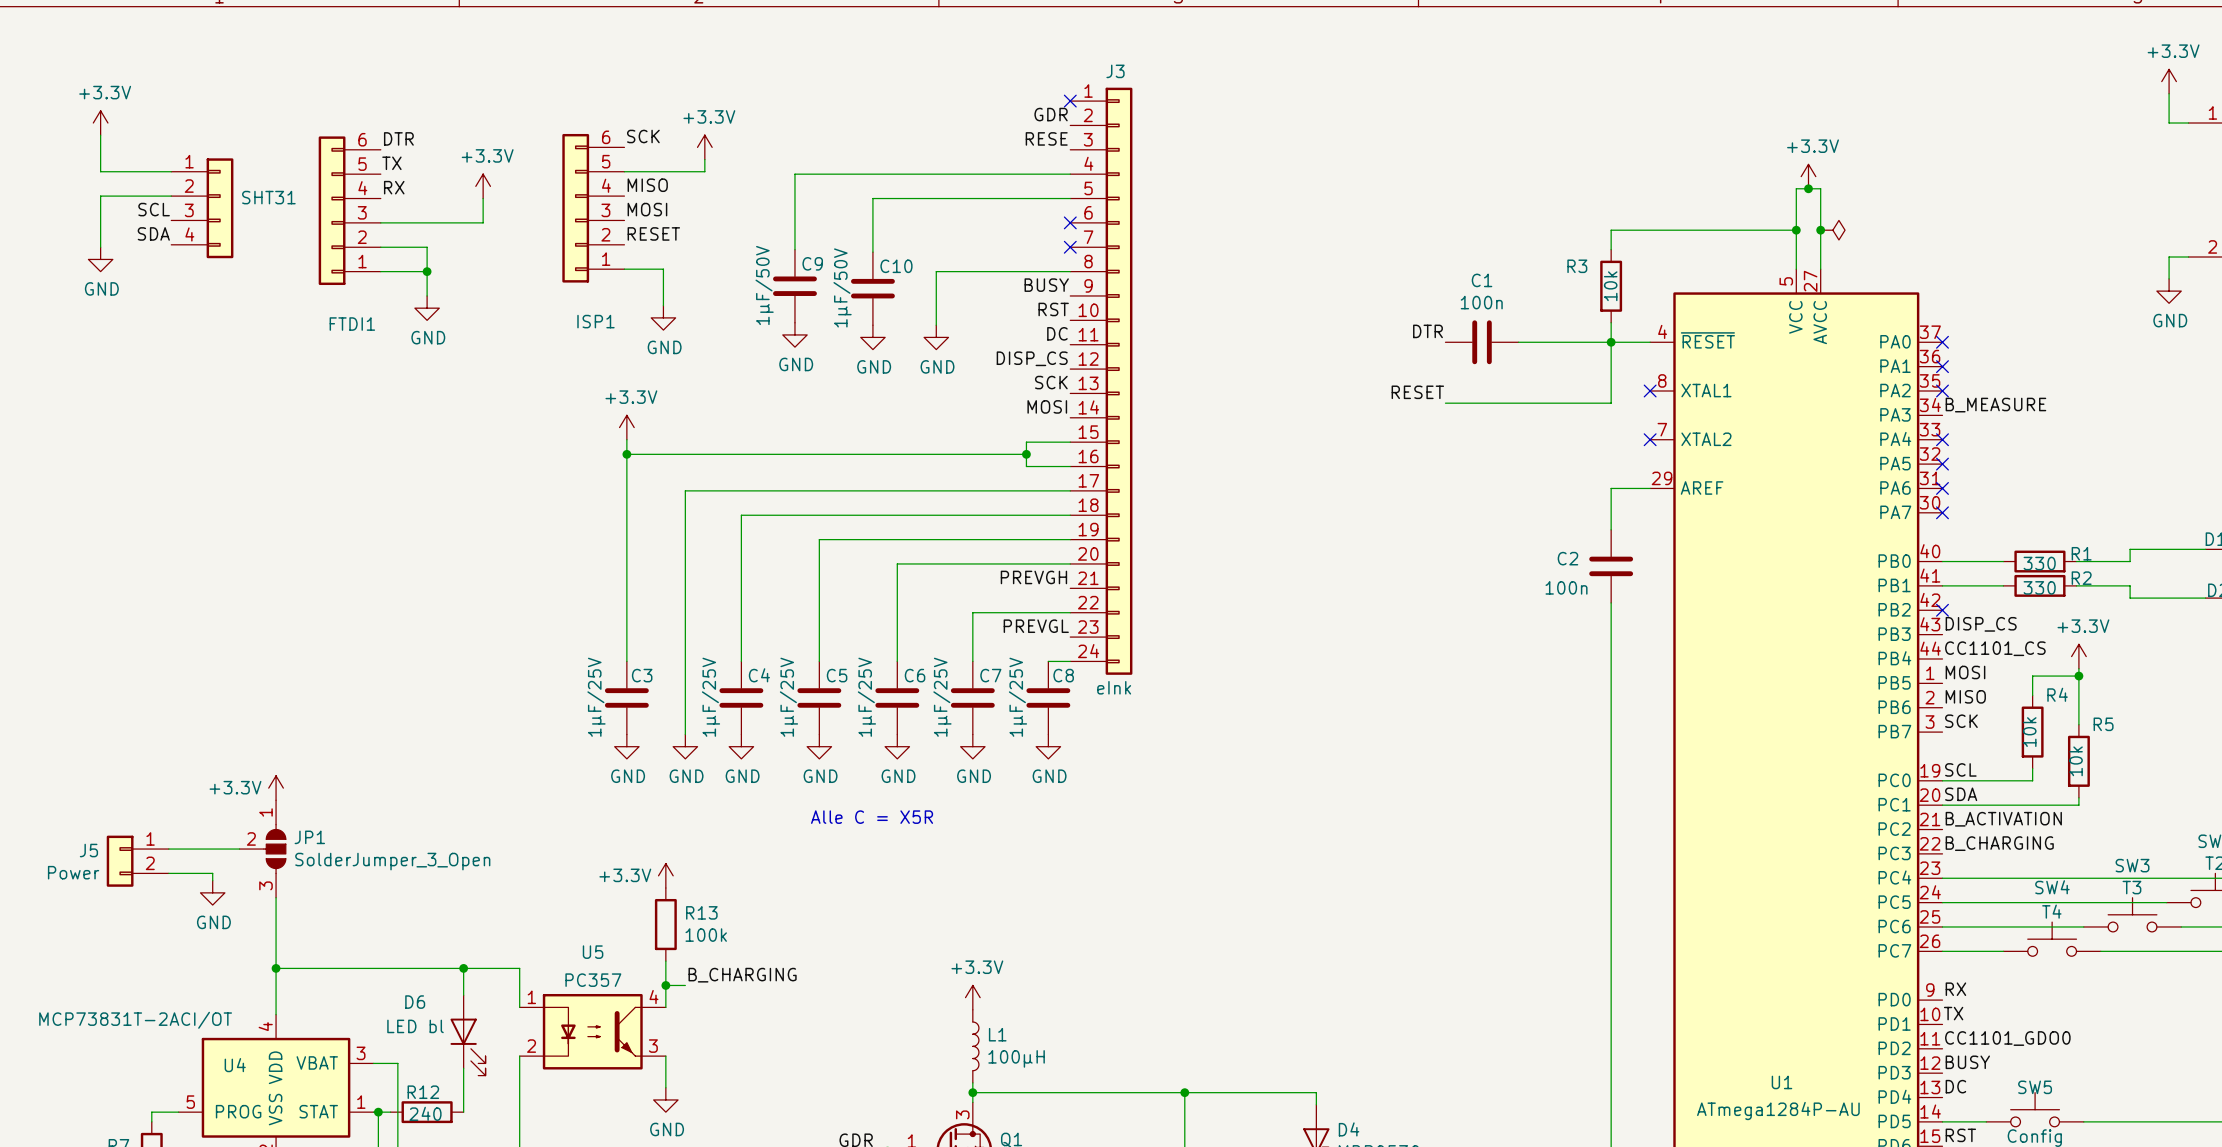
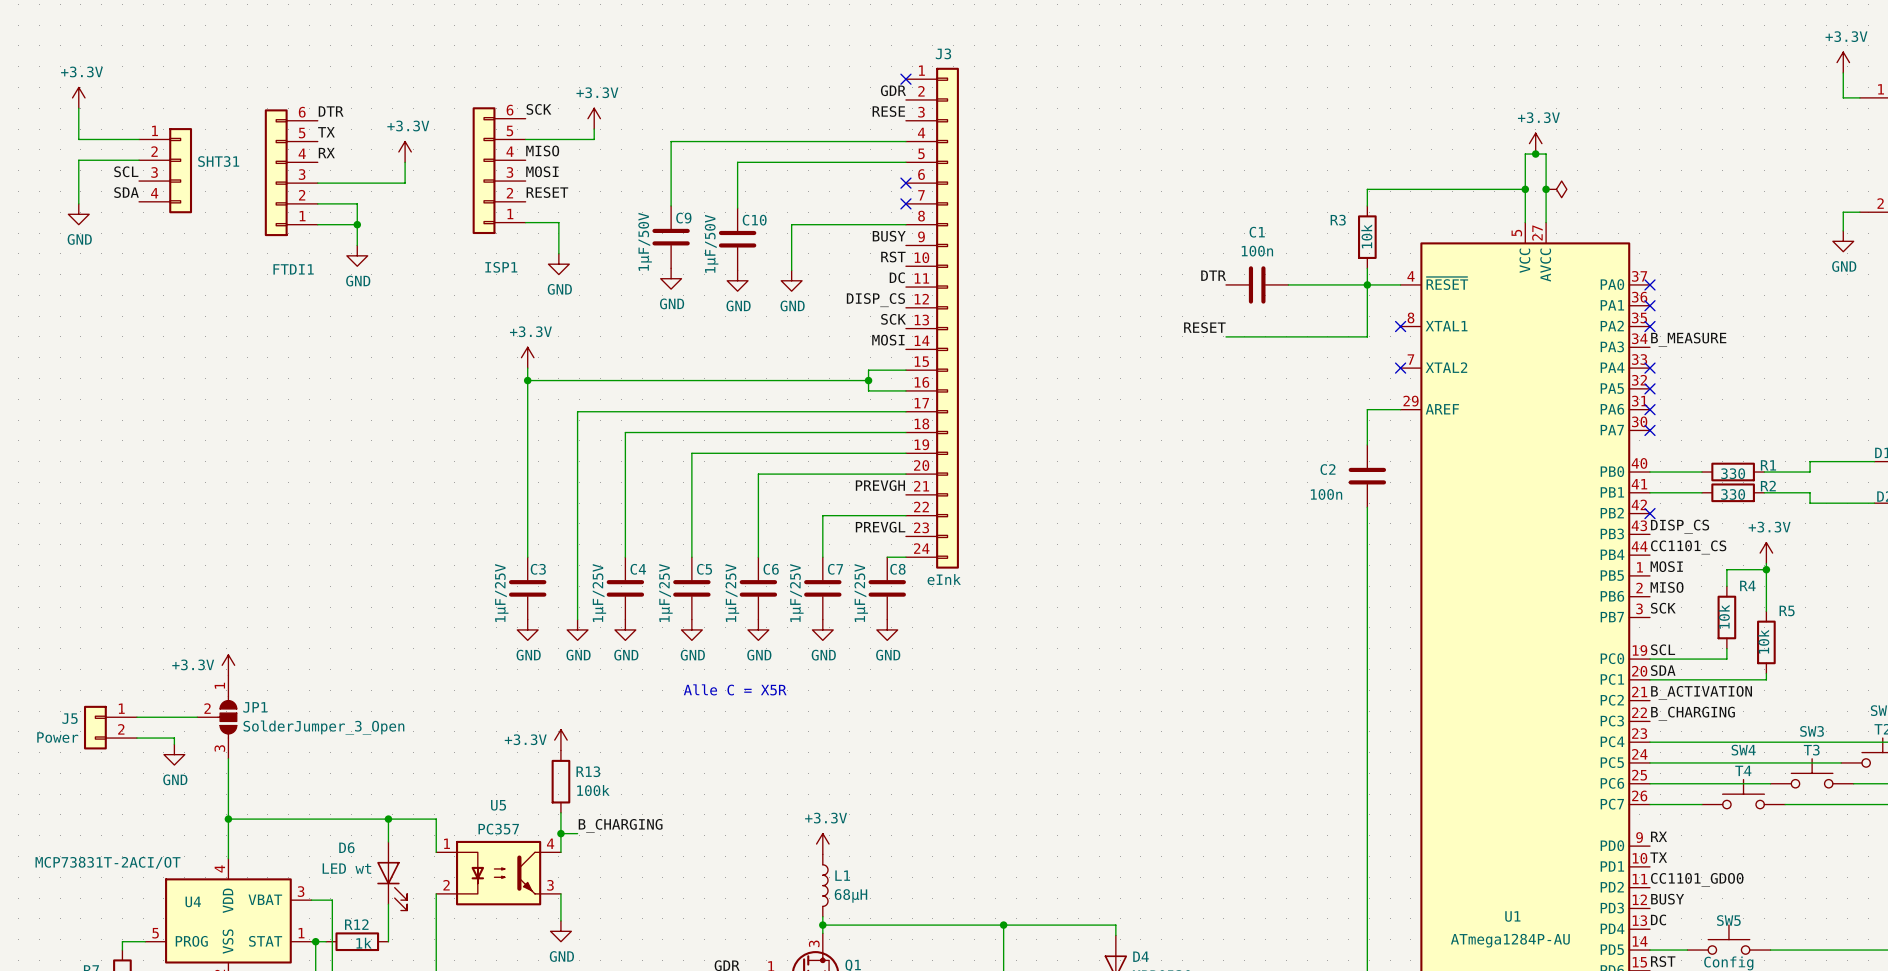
D6 value: LED bl (415, 1026) -> LED wt (346, 868)
L1 value: 100µH (1016, 1058) -> 68µH (850, 895)
R12 value: 240 (425, 1113) -> 1k (363, 943)

